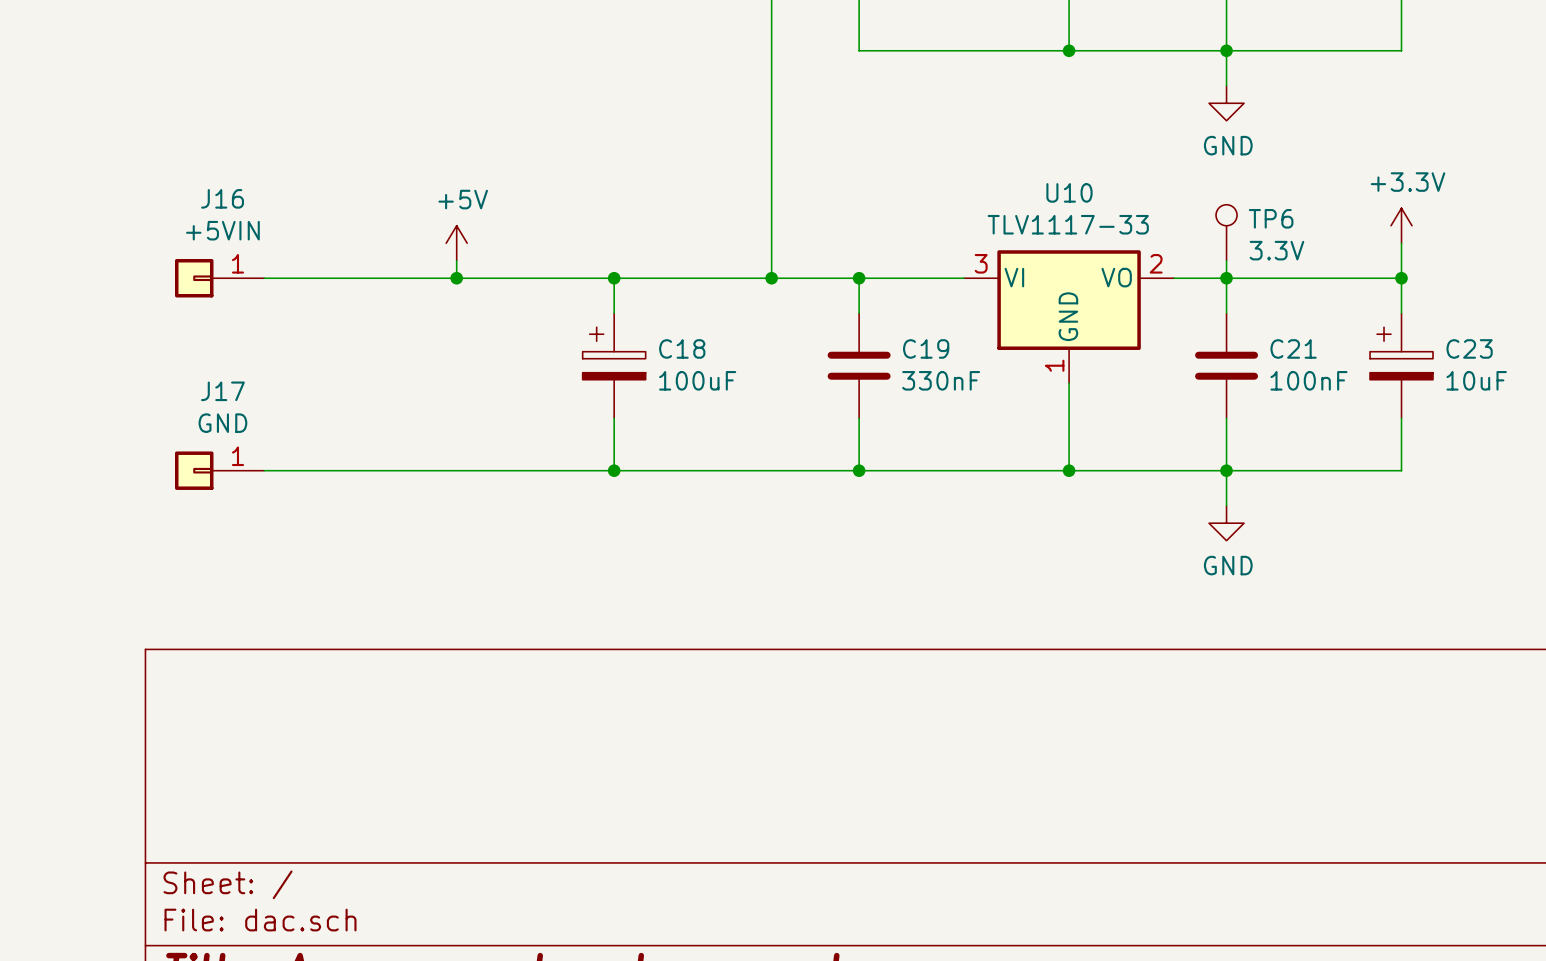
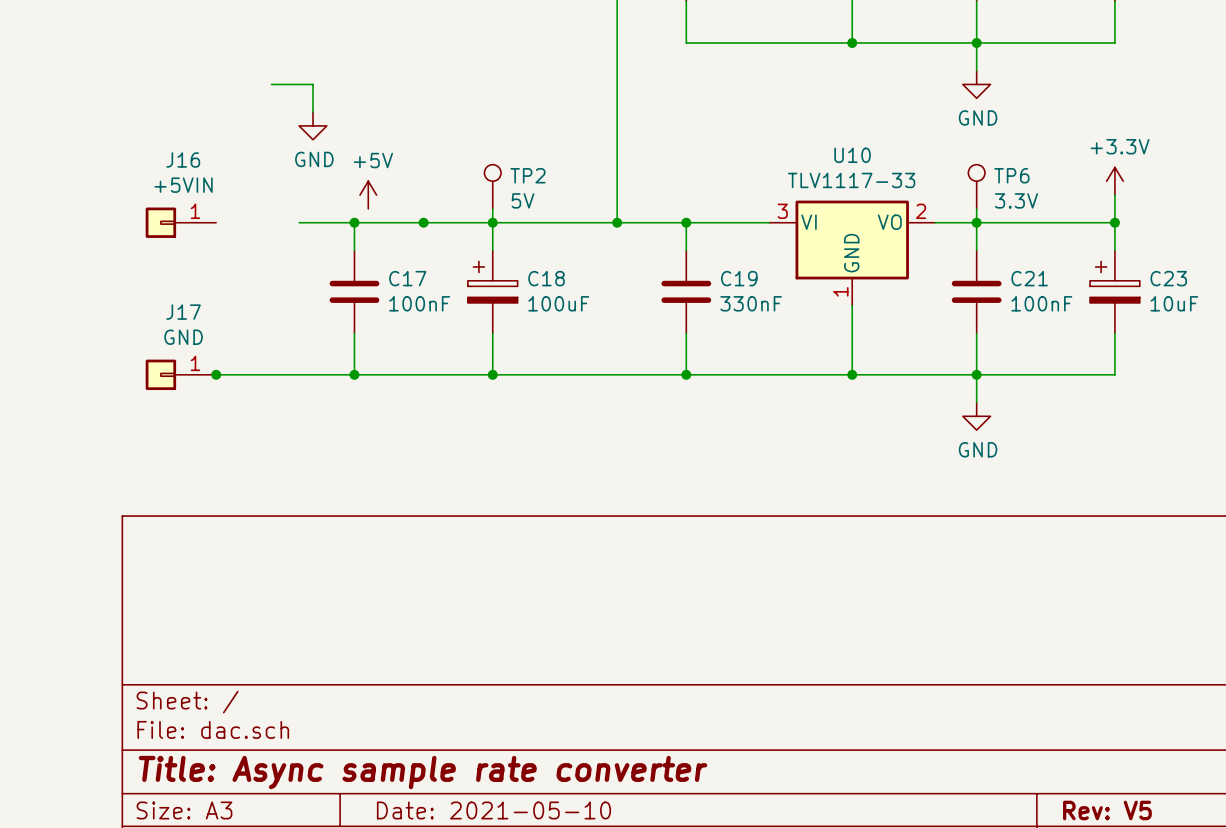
wire: none -> (271, 84) (312, 84) (312, 112)
power symbol: none -> GND (312, 125)
TP2: none -> 5V (492, 186)
wire: (456, 260) (456, 278) -> (492, 208) (492, 222)
wire: (264, 278) (369, 278) -> none
wire: none -> (354, 222) (354, 250)
junction position: (456, 278) -> (354, 222)
junction: none -> (423, 222)
C17: none -> 100nF (354, 291)
wire: none -> (354, 333) (354, 374)
junction: none -> (216, 374)
junction: none -> (354, 374)

